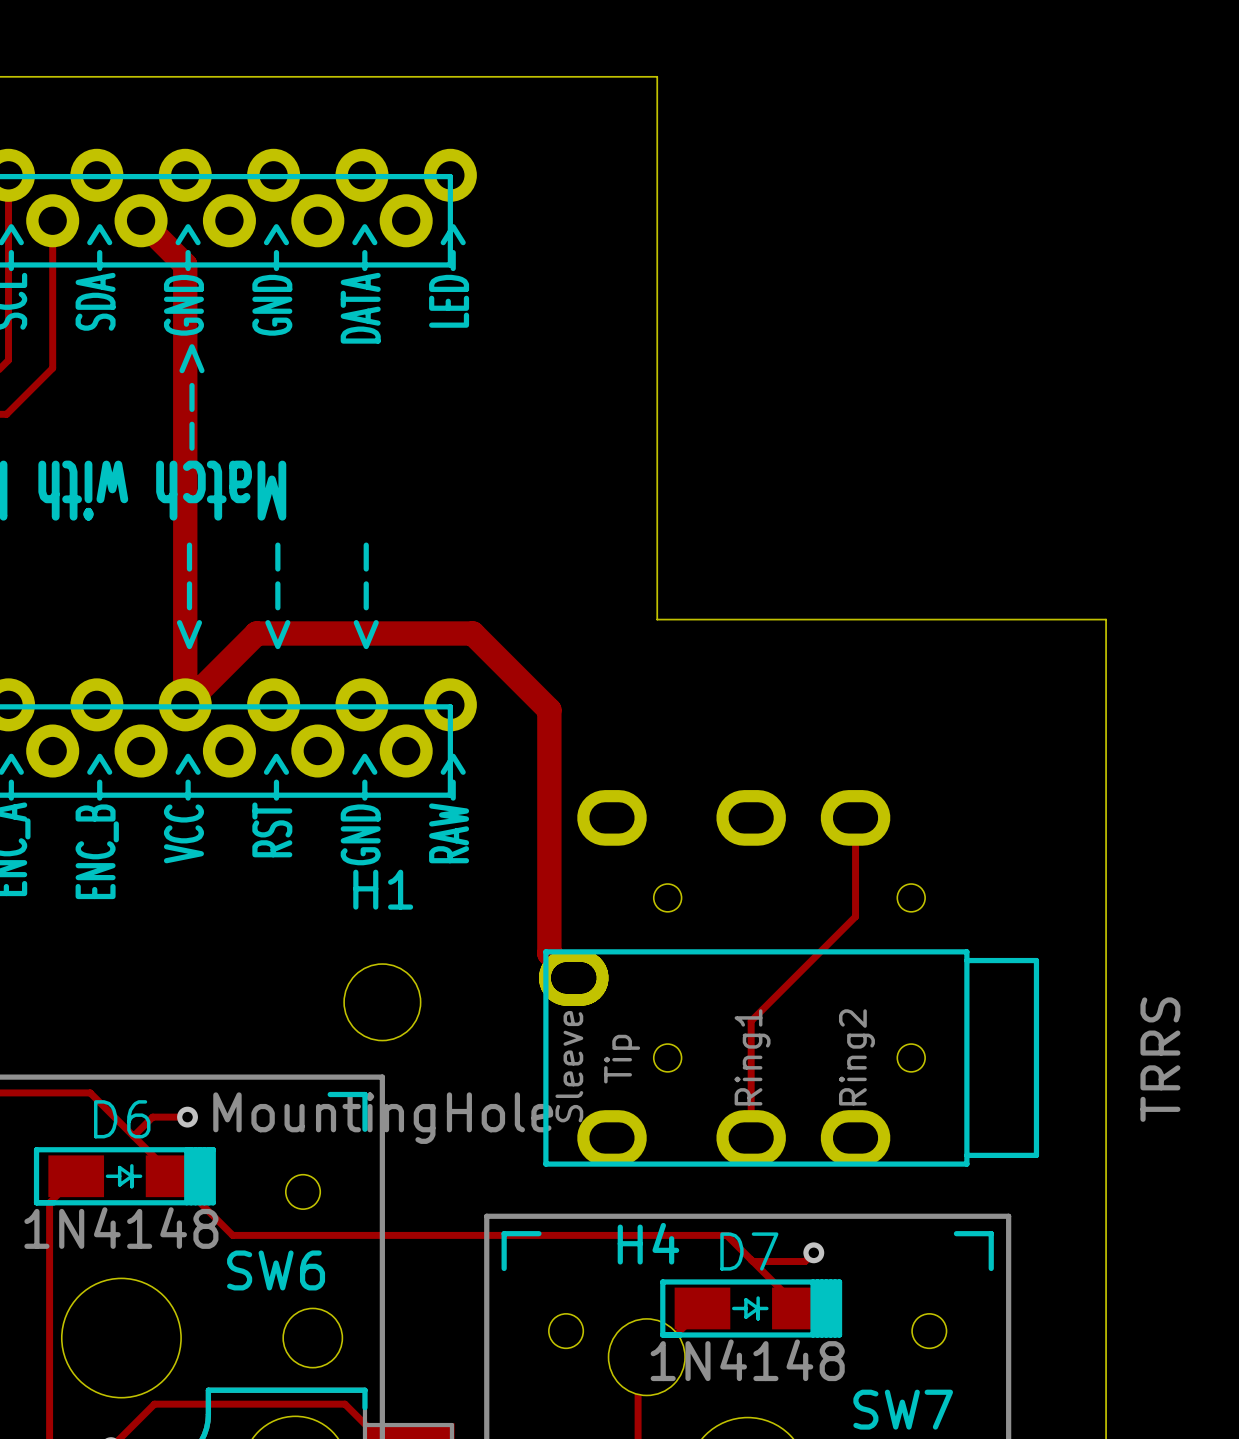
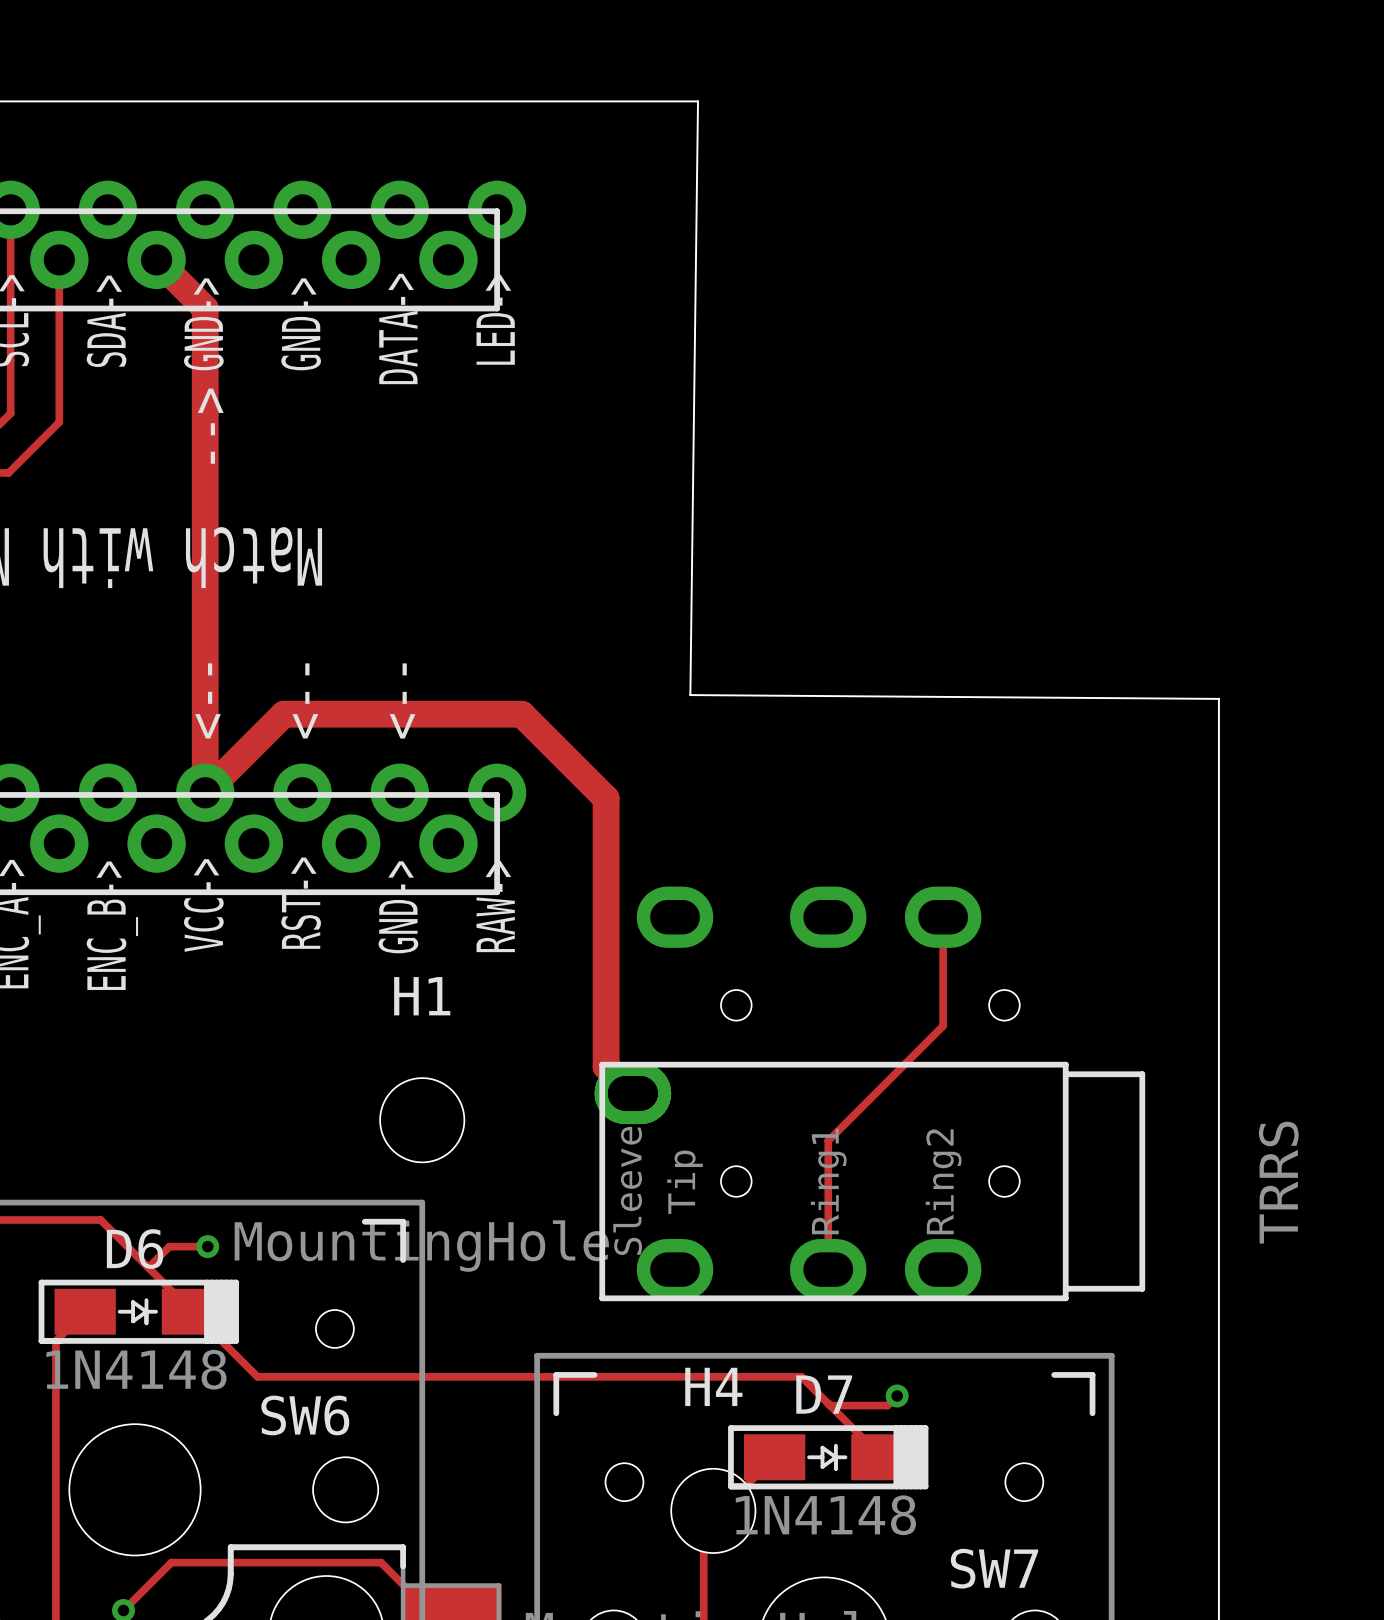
board edge: (632, 76) (657, 76) (657, 619) (1106, 619) -> (698, 101) (690, 695) (1218, 698)

